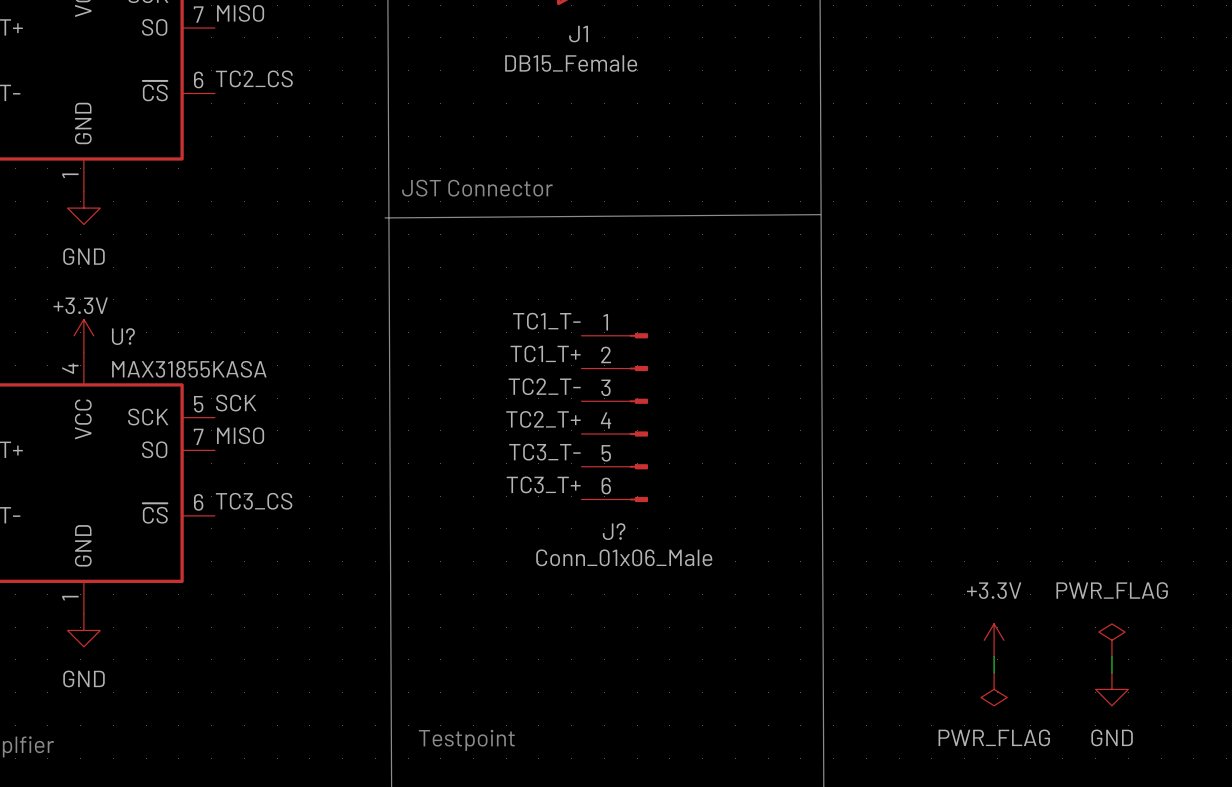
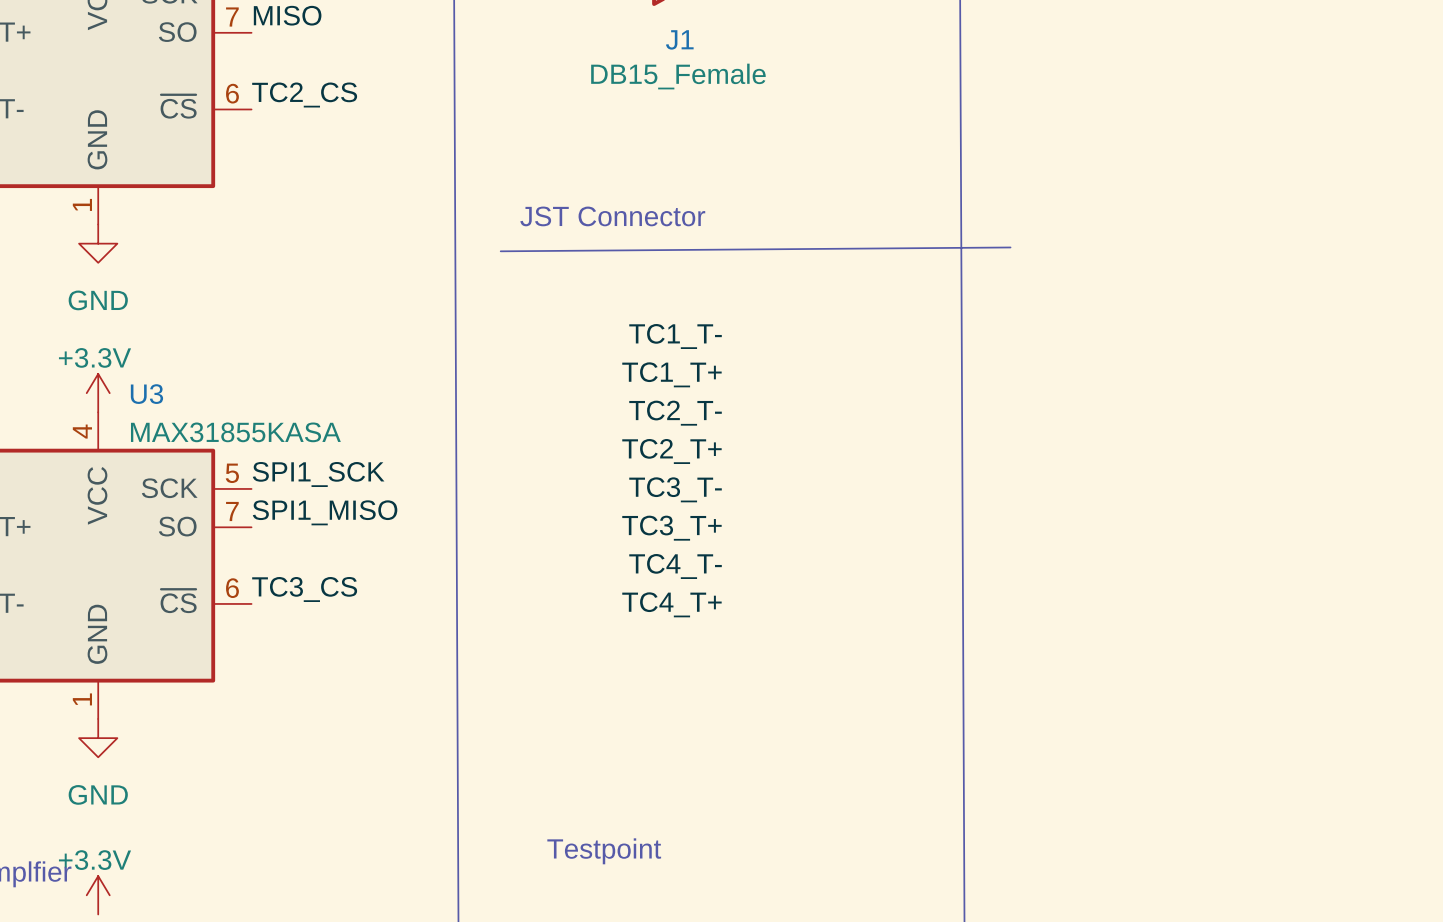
text position: JST Connector (477, 188) -> JST Connector (612, 216)
line: (820, 214) (385, 217) -> (1010, 247) (500, 251)
label position: TC1_T- (546, 321) -> TC1_T- (675, 336)
U? name: U? (123, 336) -> U3 (146, 394)
label position: TC1_T+ (545, 353) -> TC1_T+ (671, 374)
label position: TC2_T- (544, 386) -> TC2_T- (675, 413)
label: SCK (236, 403) -> SPI1_SCK (318, 474)
J?: Conn_01x06_Male (614, 417) -> none
label position: TC2_T+ (543, 419) -> TC2_T+ (671, 451)
label: MISO (240, 435) -> SPI1_MISO (325, 512)
label position: TC3_T- (544, 452) -> TC3_T- (675, 489)
label: none -> TC4_T- (675, 566)
label position: TC3_T+ (543, 484) -> TC3_T+ (671, 528)
label: none -> TC4_T+ (671, 604)
power symbol: +3.3V (994, 640) -> none
power symbol: PWR_FLAG (1111, 640) -> none
wire: (994, 656) (994, 673) -> none
wire: (1111, 656) (1111, 673) -> none
power symbol: PWR_FLAG (994, 689) -> none
power symbol: GND (1111, 689) -> none
text position: Testpoint (466, 740) -> Testpoint (604, 851)
power symbol: none -> +3.3V (98, 895)

